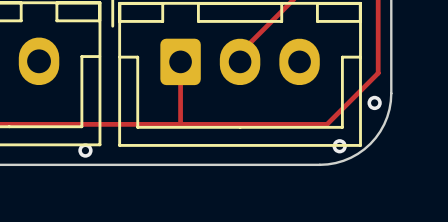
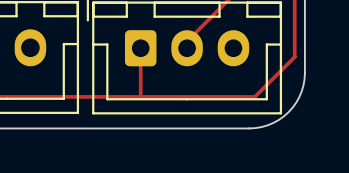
via: (374, 102) -> none
via: (339, 146) -> none
via: (85, 150) -> none

